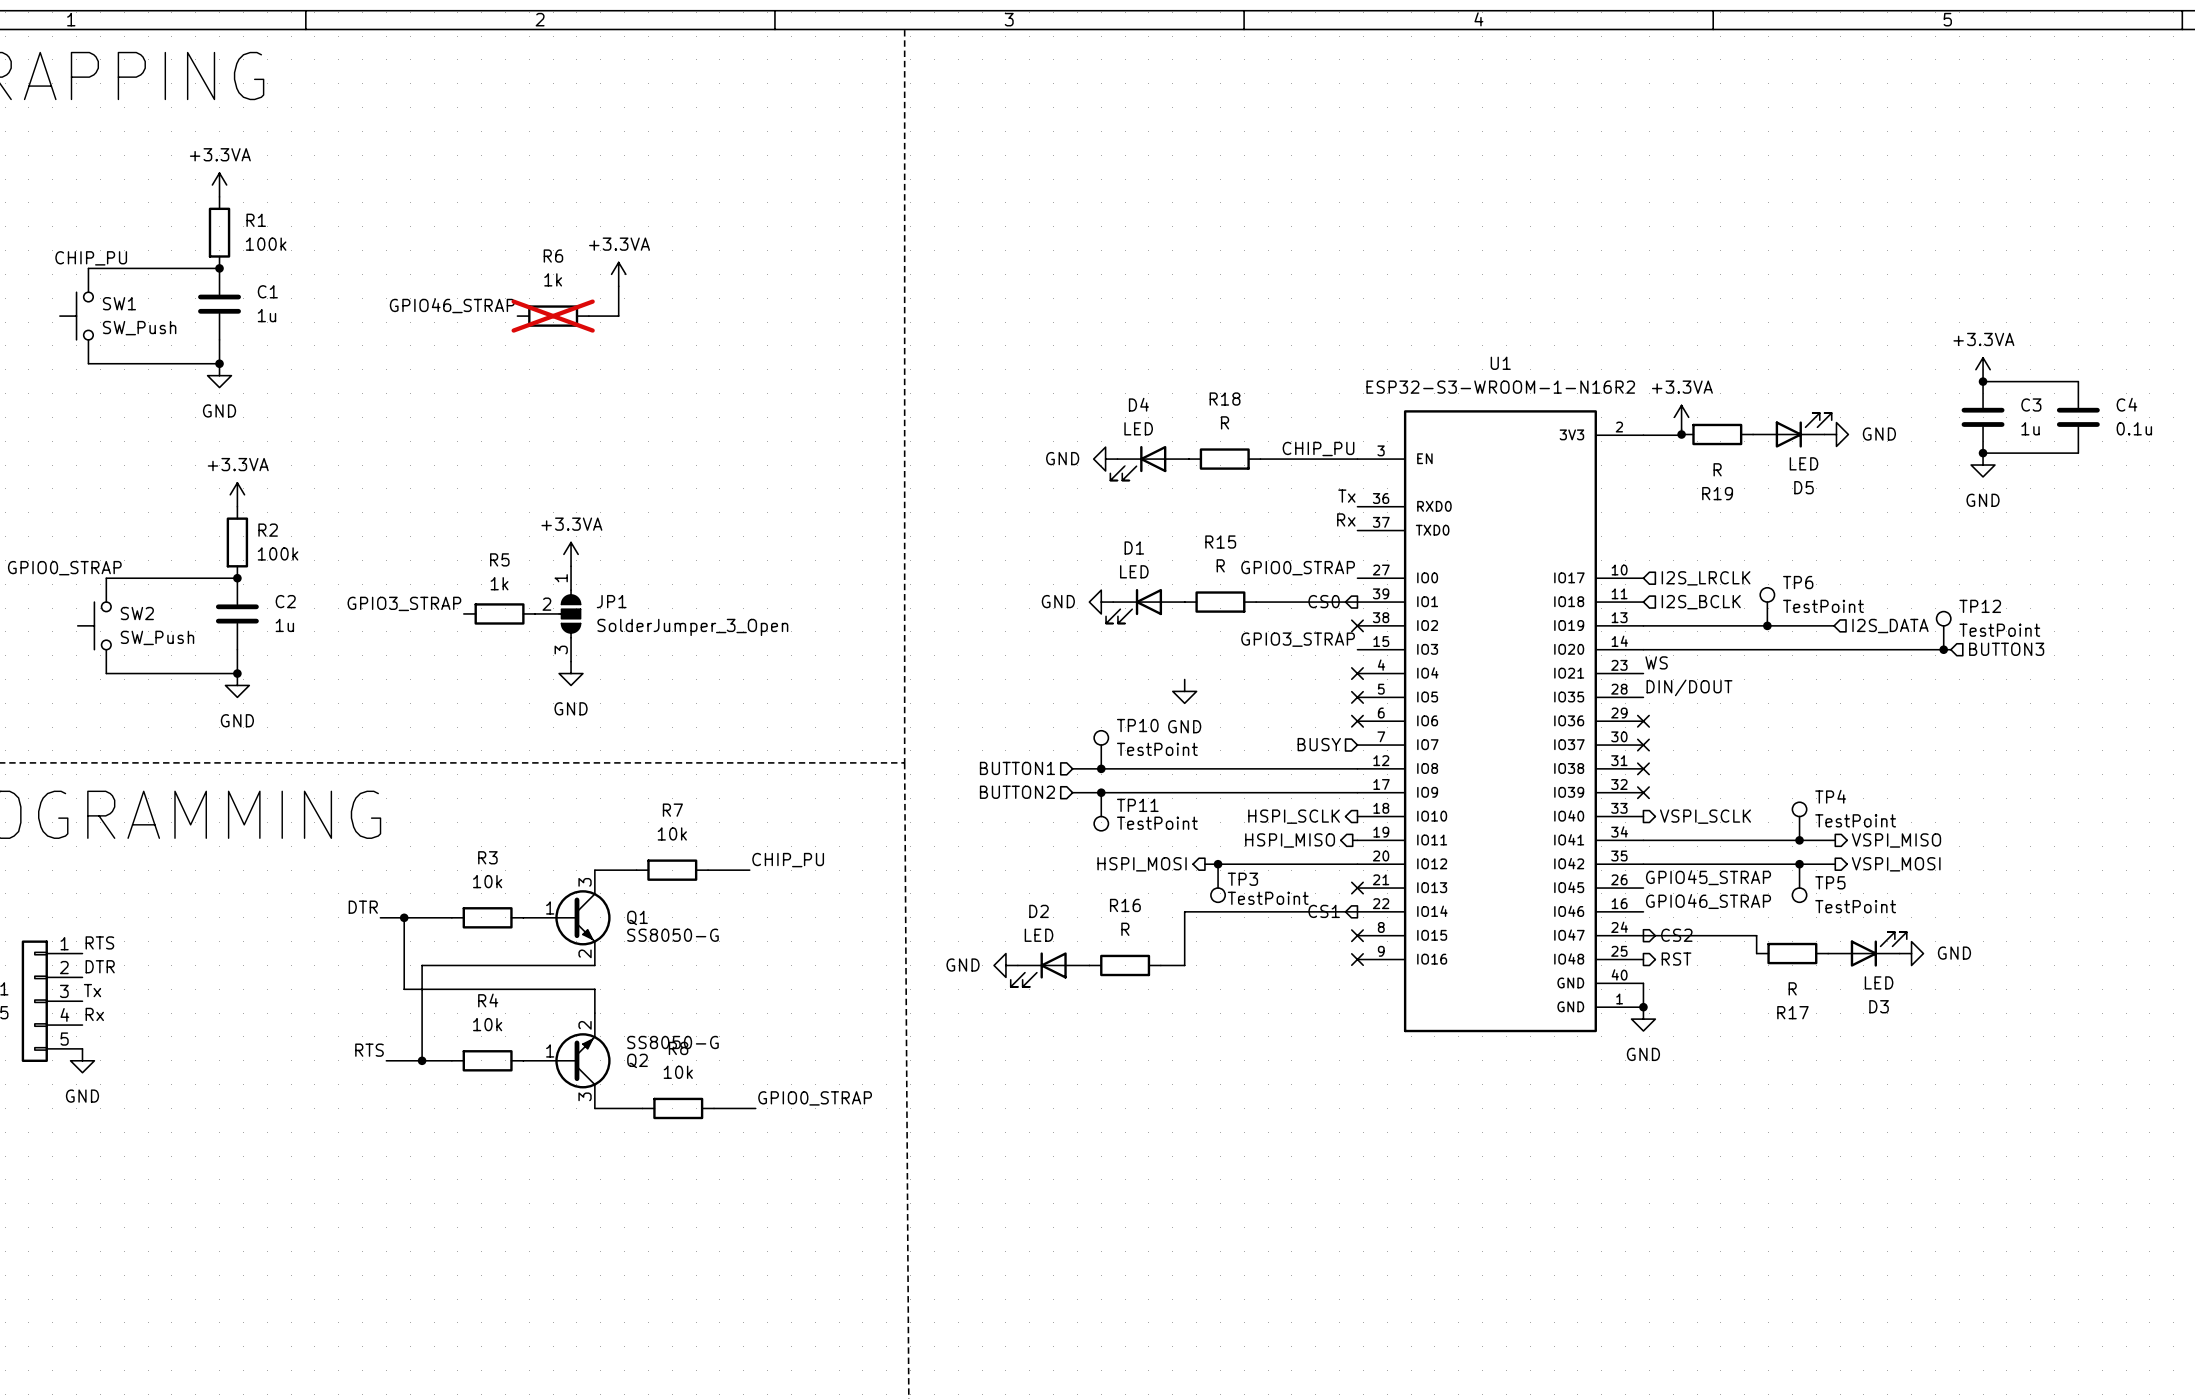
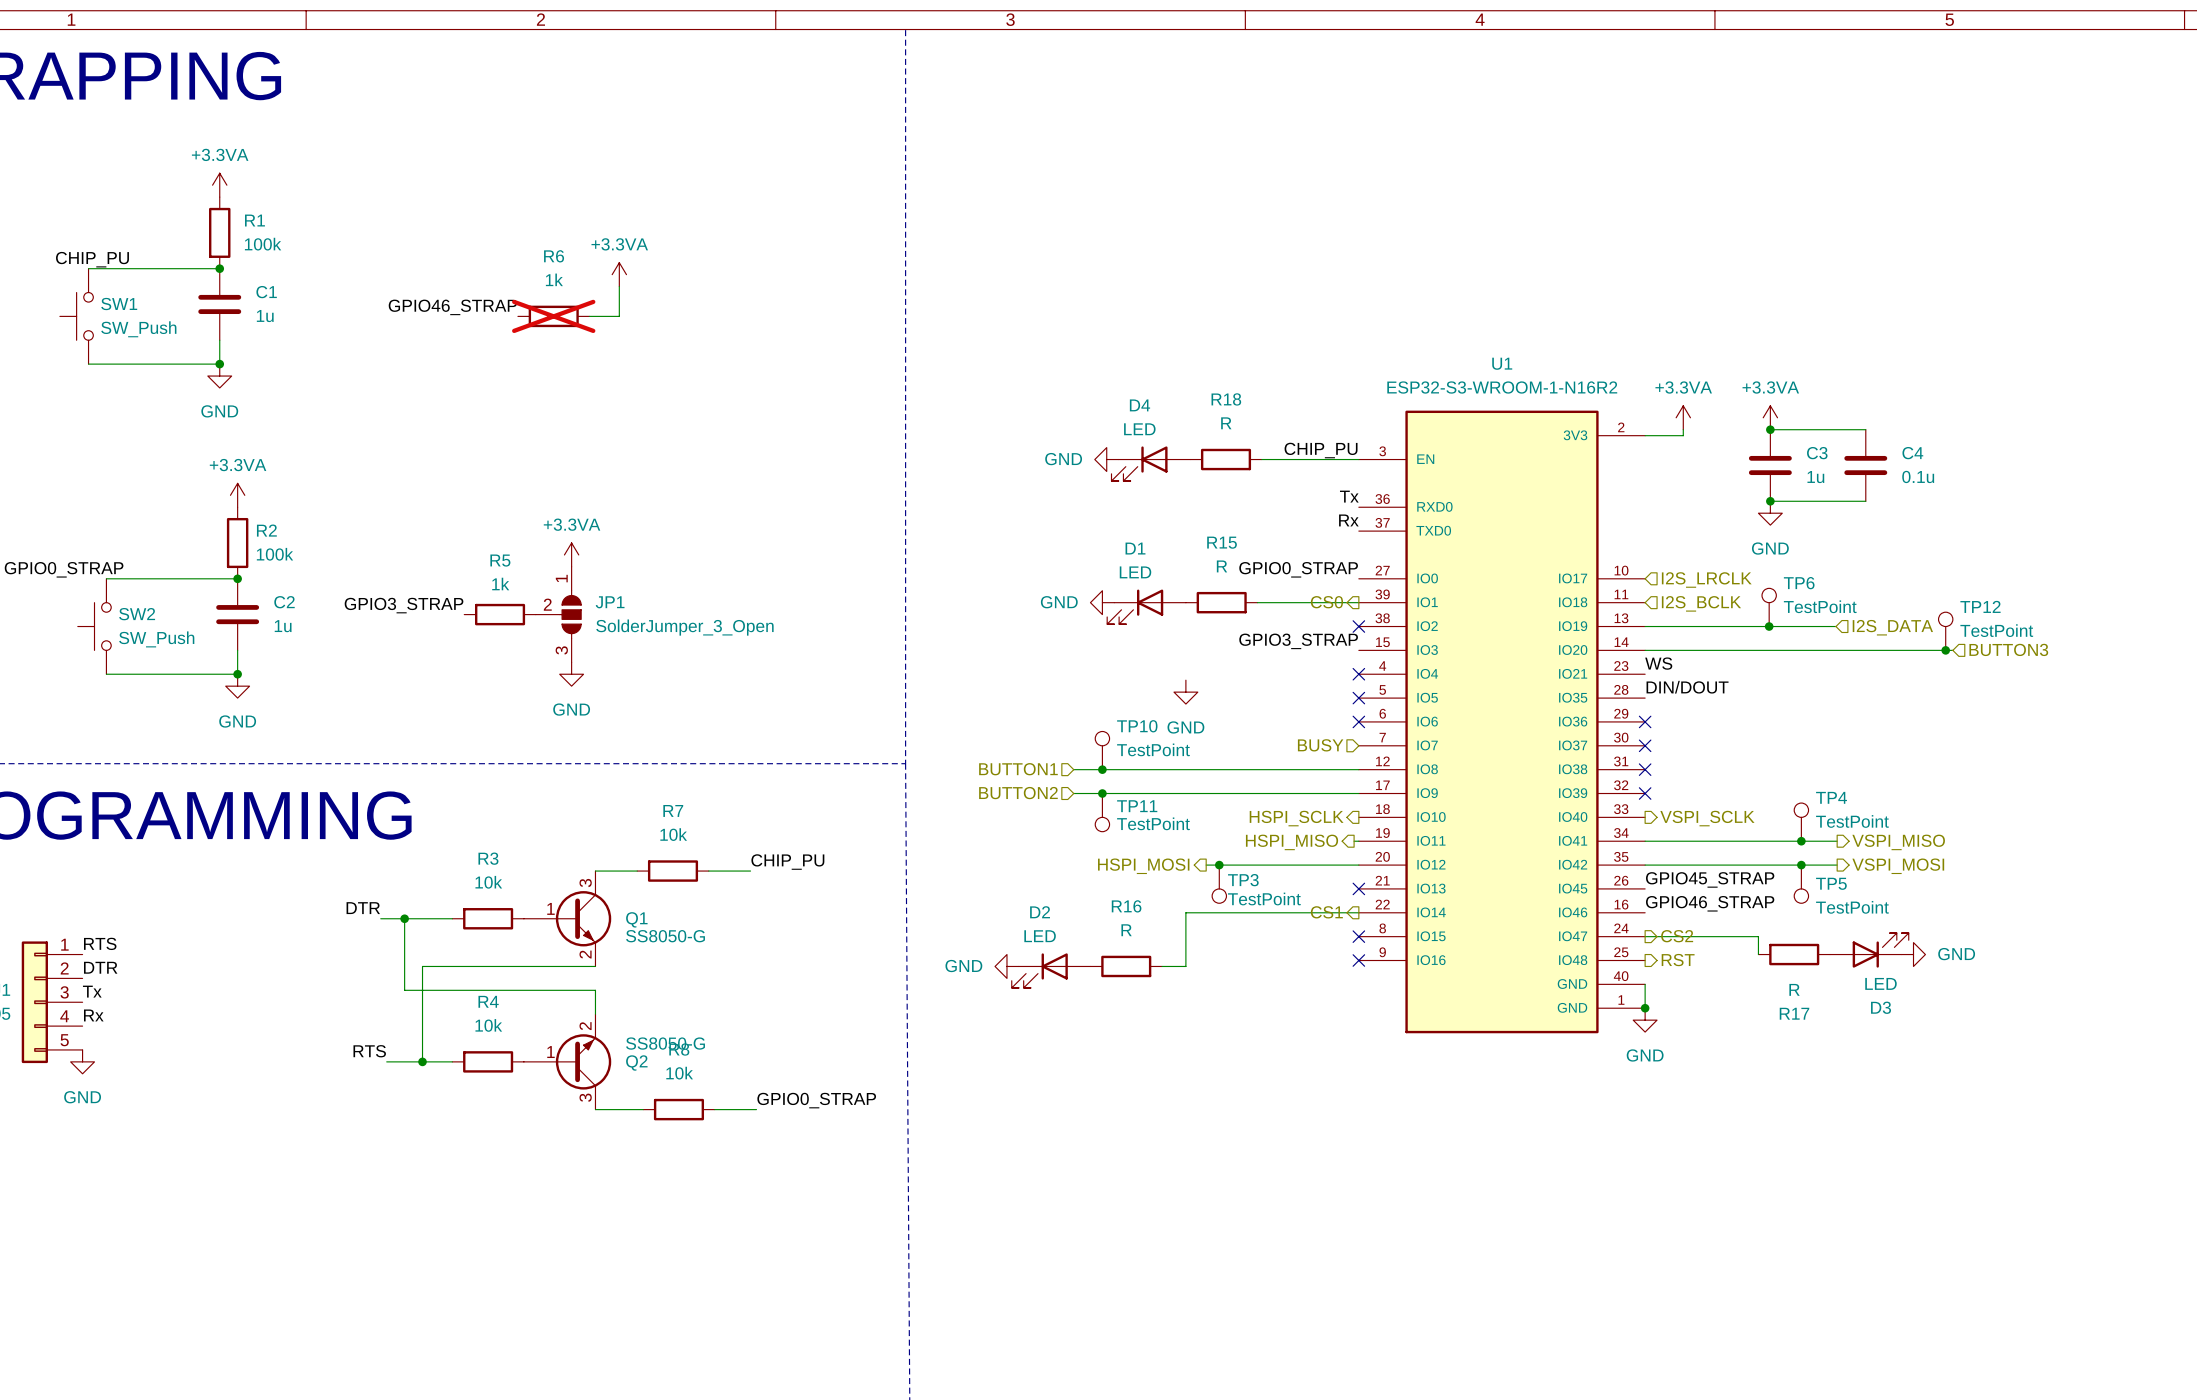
power symbol position: +3.3VA (1983, 369) -> +3.3VA (1770, 417)
wire: (1983, 381) (2078, 381) -> (1770, 429) (1865, 429)
junction: (1983, 381) -> none
C3 position: (1983, 417) -> (1770, 465)
C4 position: (2078, 417) -> (1865, 465)
junction: none -> (1770, 429)
D5: LED (1792, 430) -> none
junction: (1681, 434) -> none
R19: R (1717, 434) -> none
power symbol rotation: 0° (1836, 434) -> 90° clockwise (1770, 513)
power symbol position: GND (1836, 434) -> GND (1770, 513)
wire: (1983, 453) (2078, 453) -> (1770, 501) (1865, 501)
junction: (1983, 453) -> none
power symbol: GND (1983, 465) -> none
junction: none -> (1770, 501)

